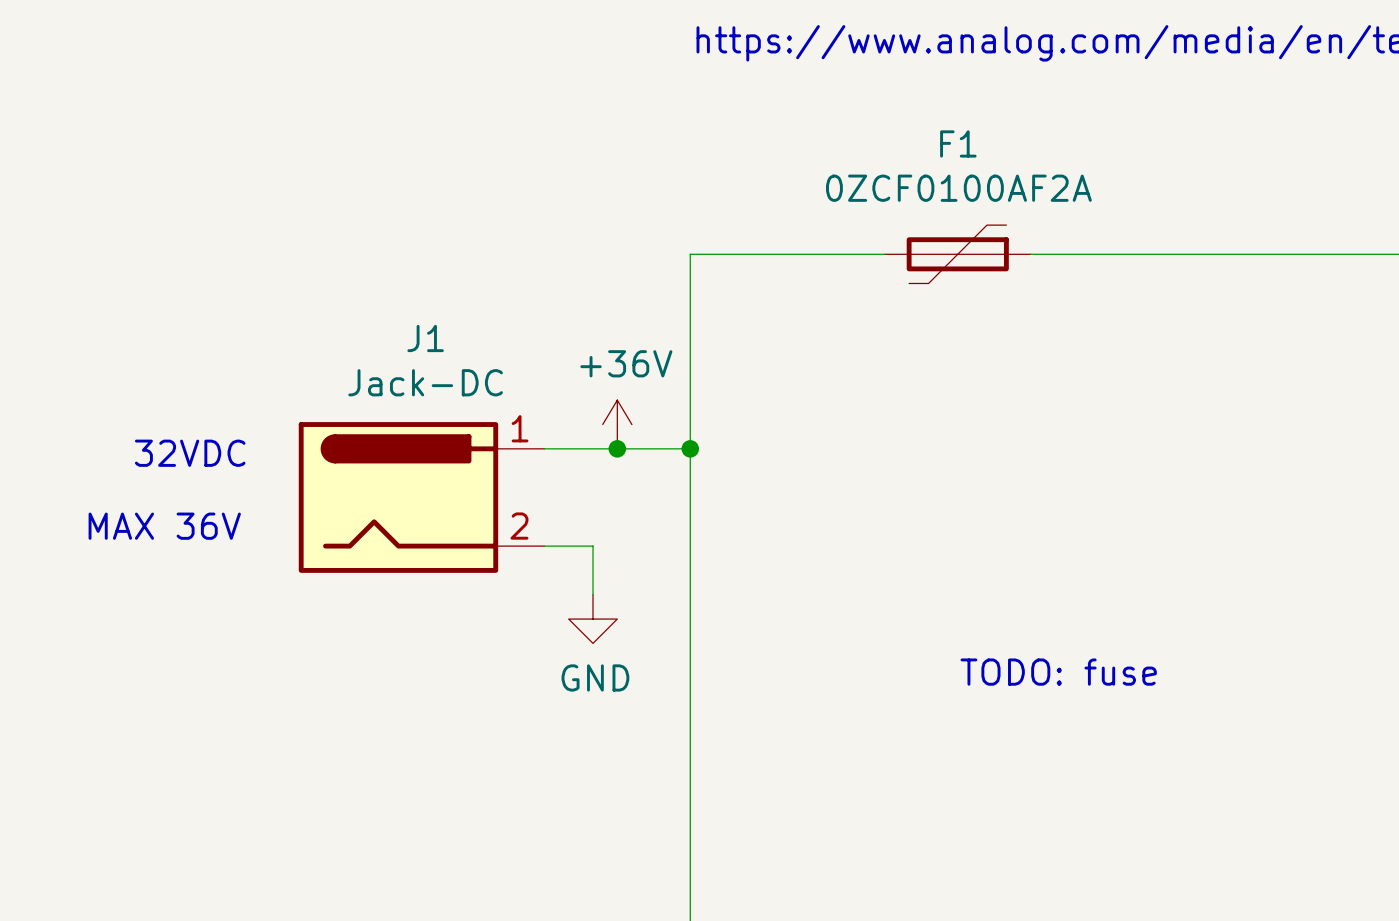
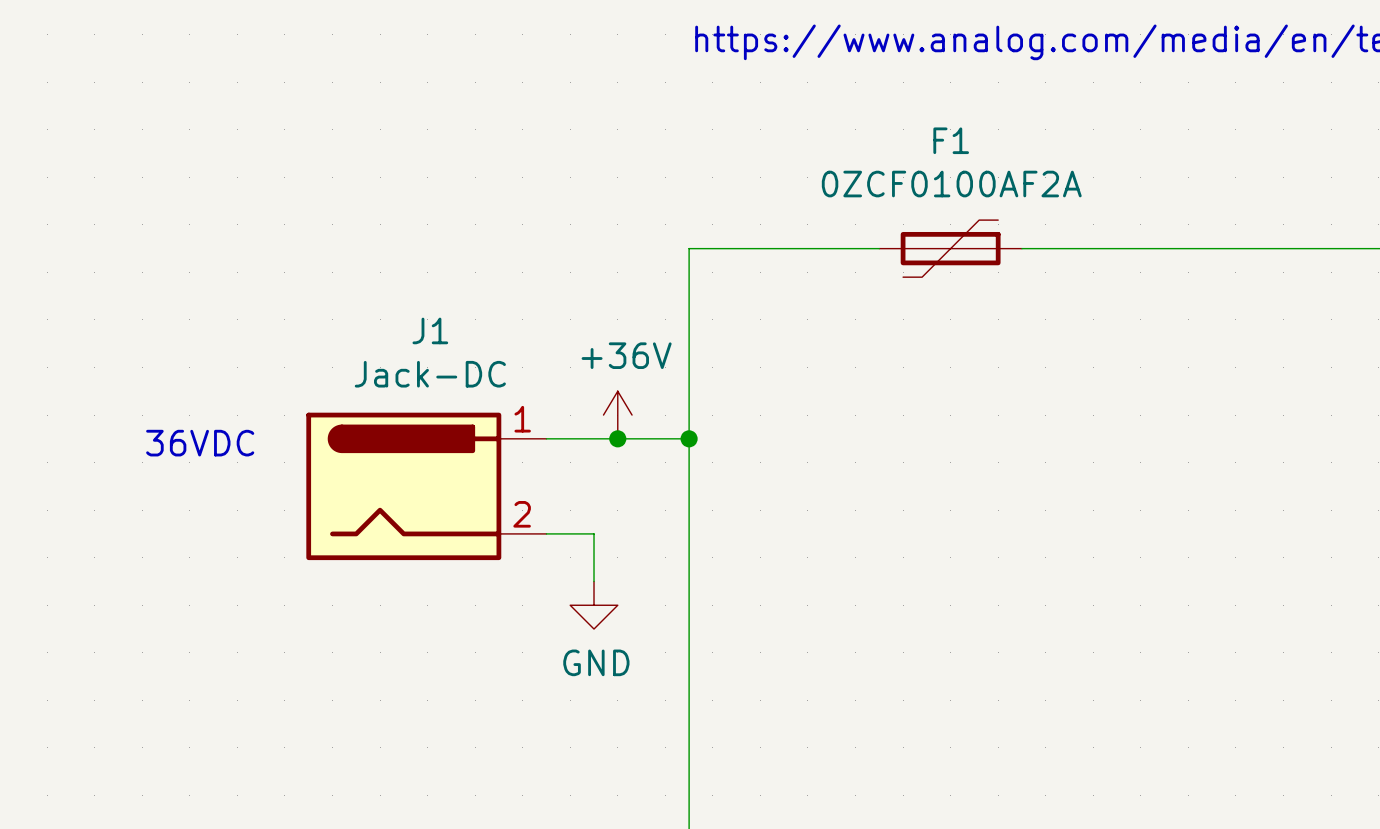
text: 32VDC (190, 453) -> 36VDC (200, 443)
text: MAX 36V (164, 526) -> none
text: TODO: fuse (1058, 672) -> none

